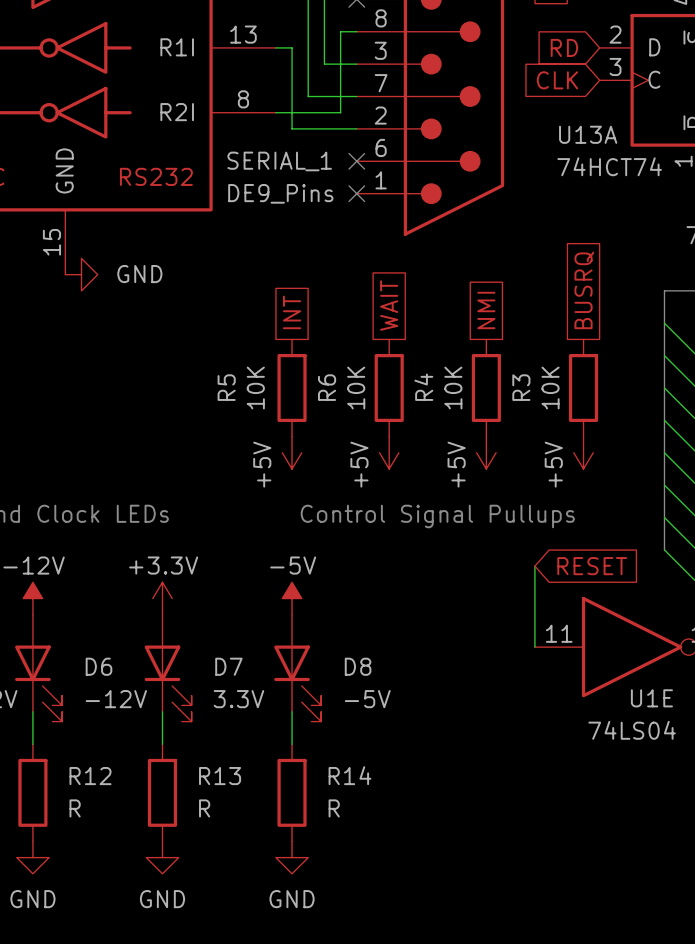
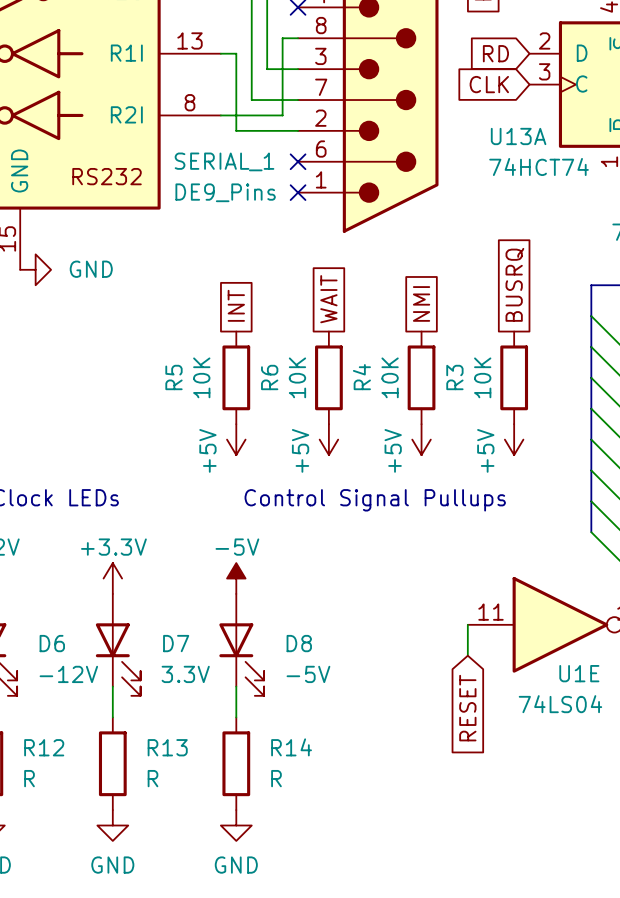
wire: (534, 566) (534, 647) -> (467, 655) (467, 624)
global label rotation: 0° (592, 566) -> 90° clockwise (467, 708)
global label position: RESET (592, 566) -> RESET (467, 708)

